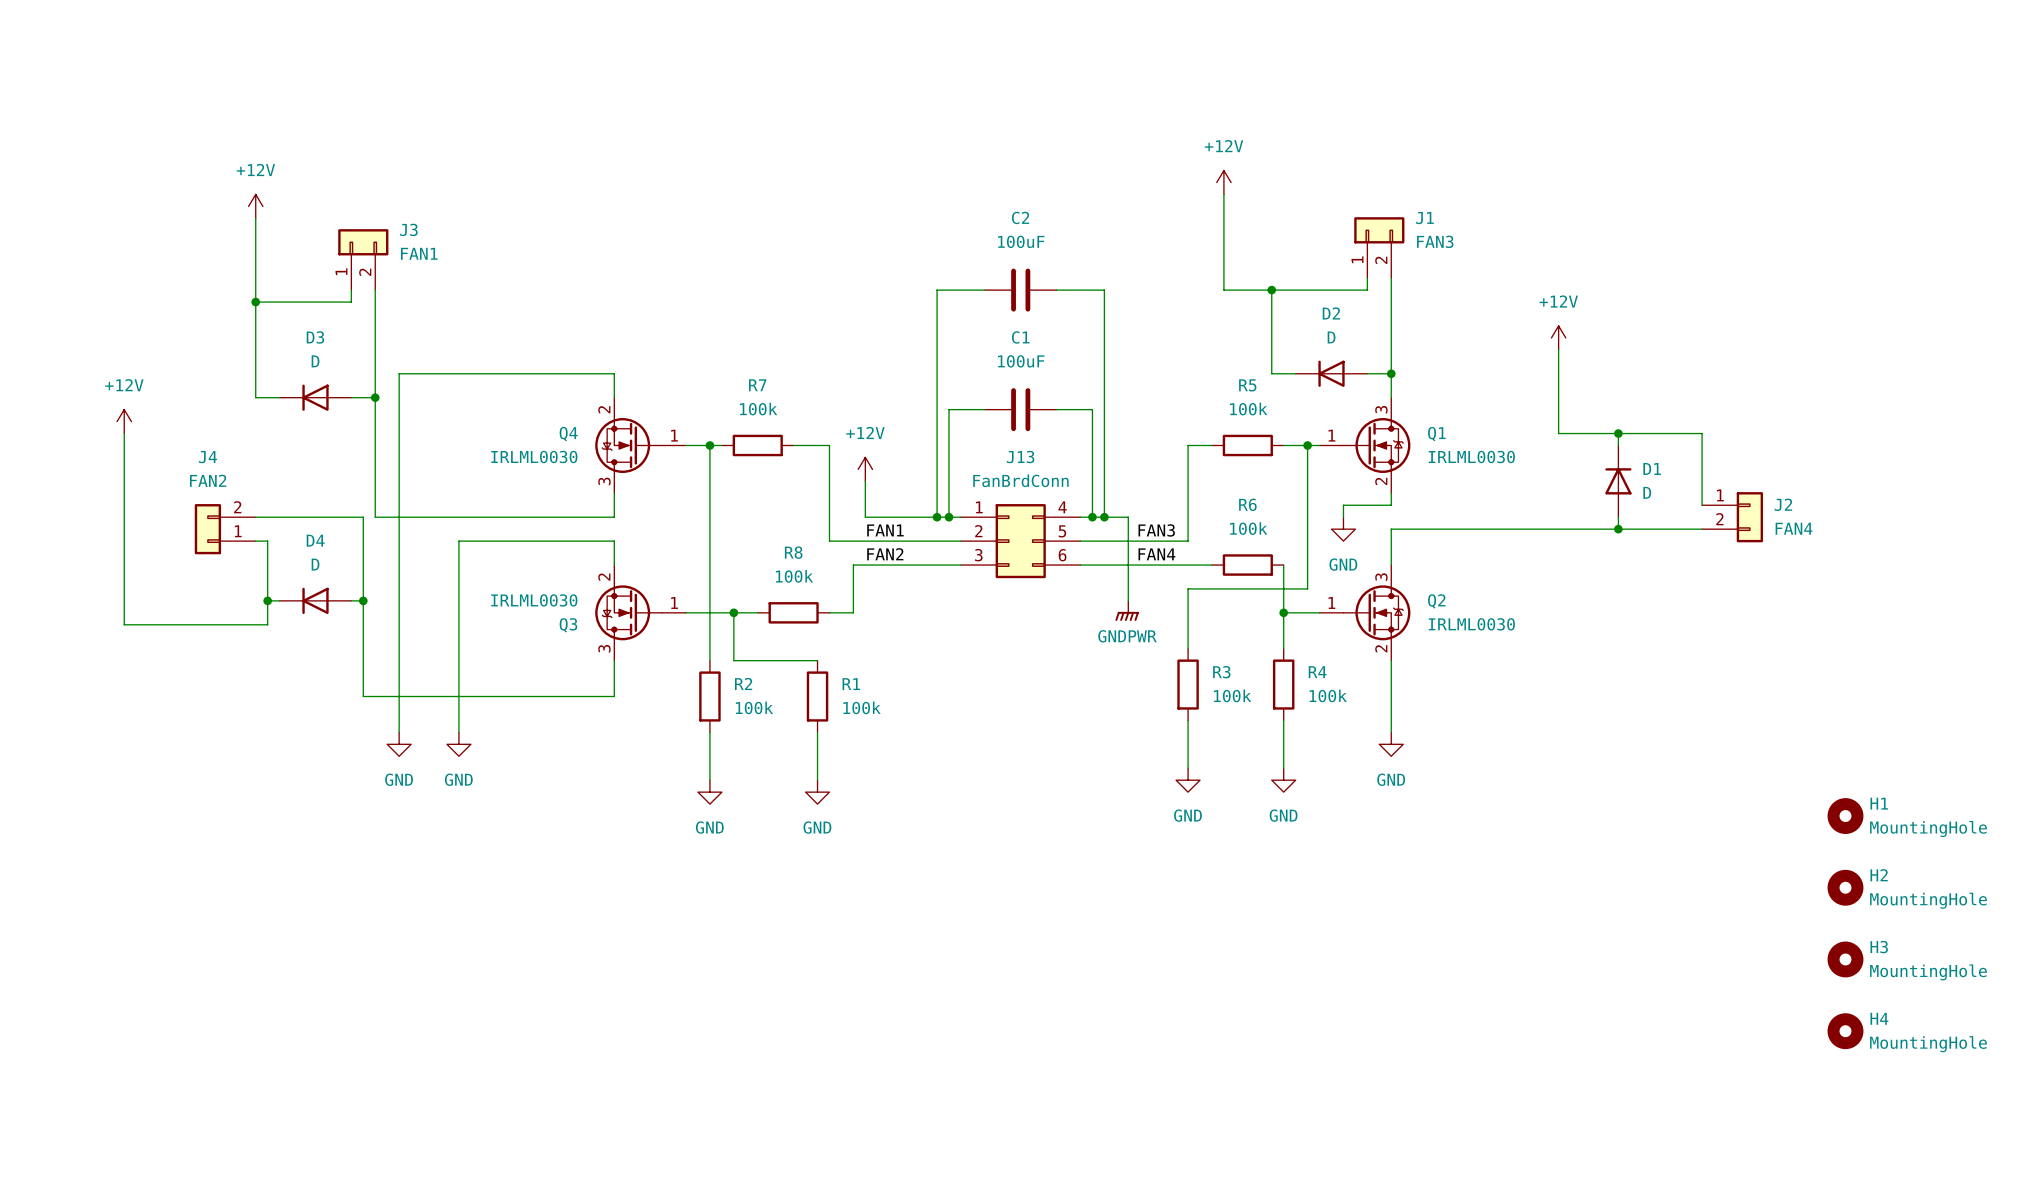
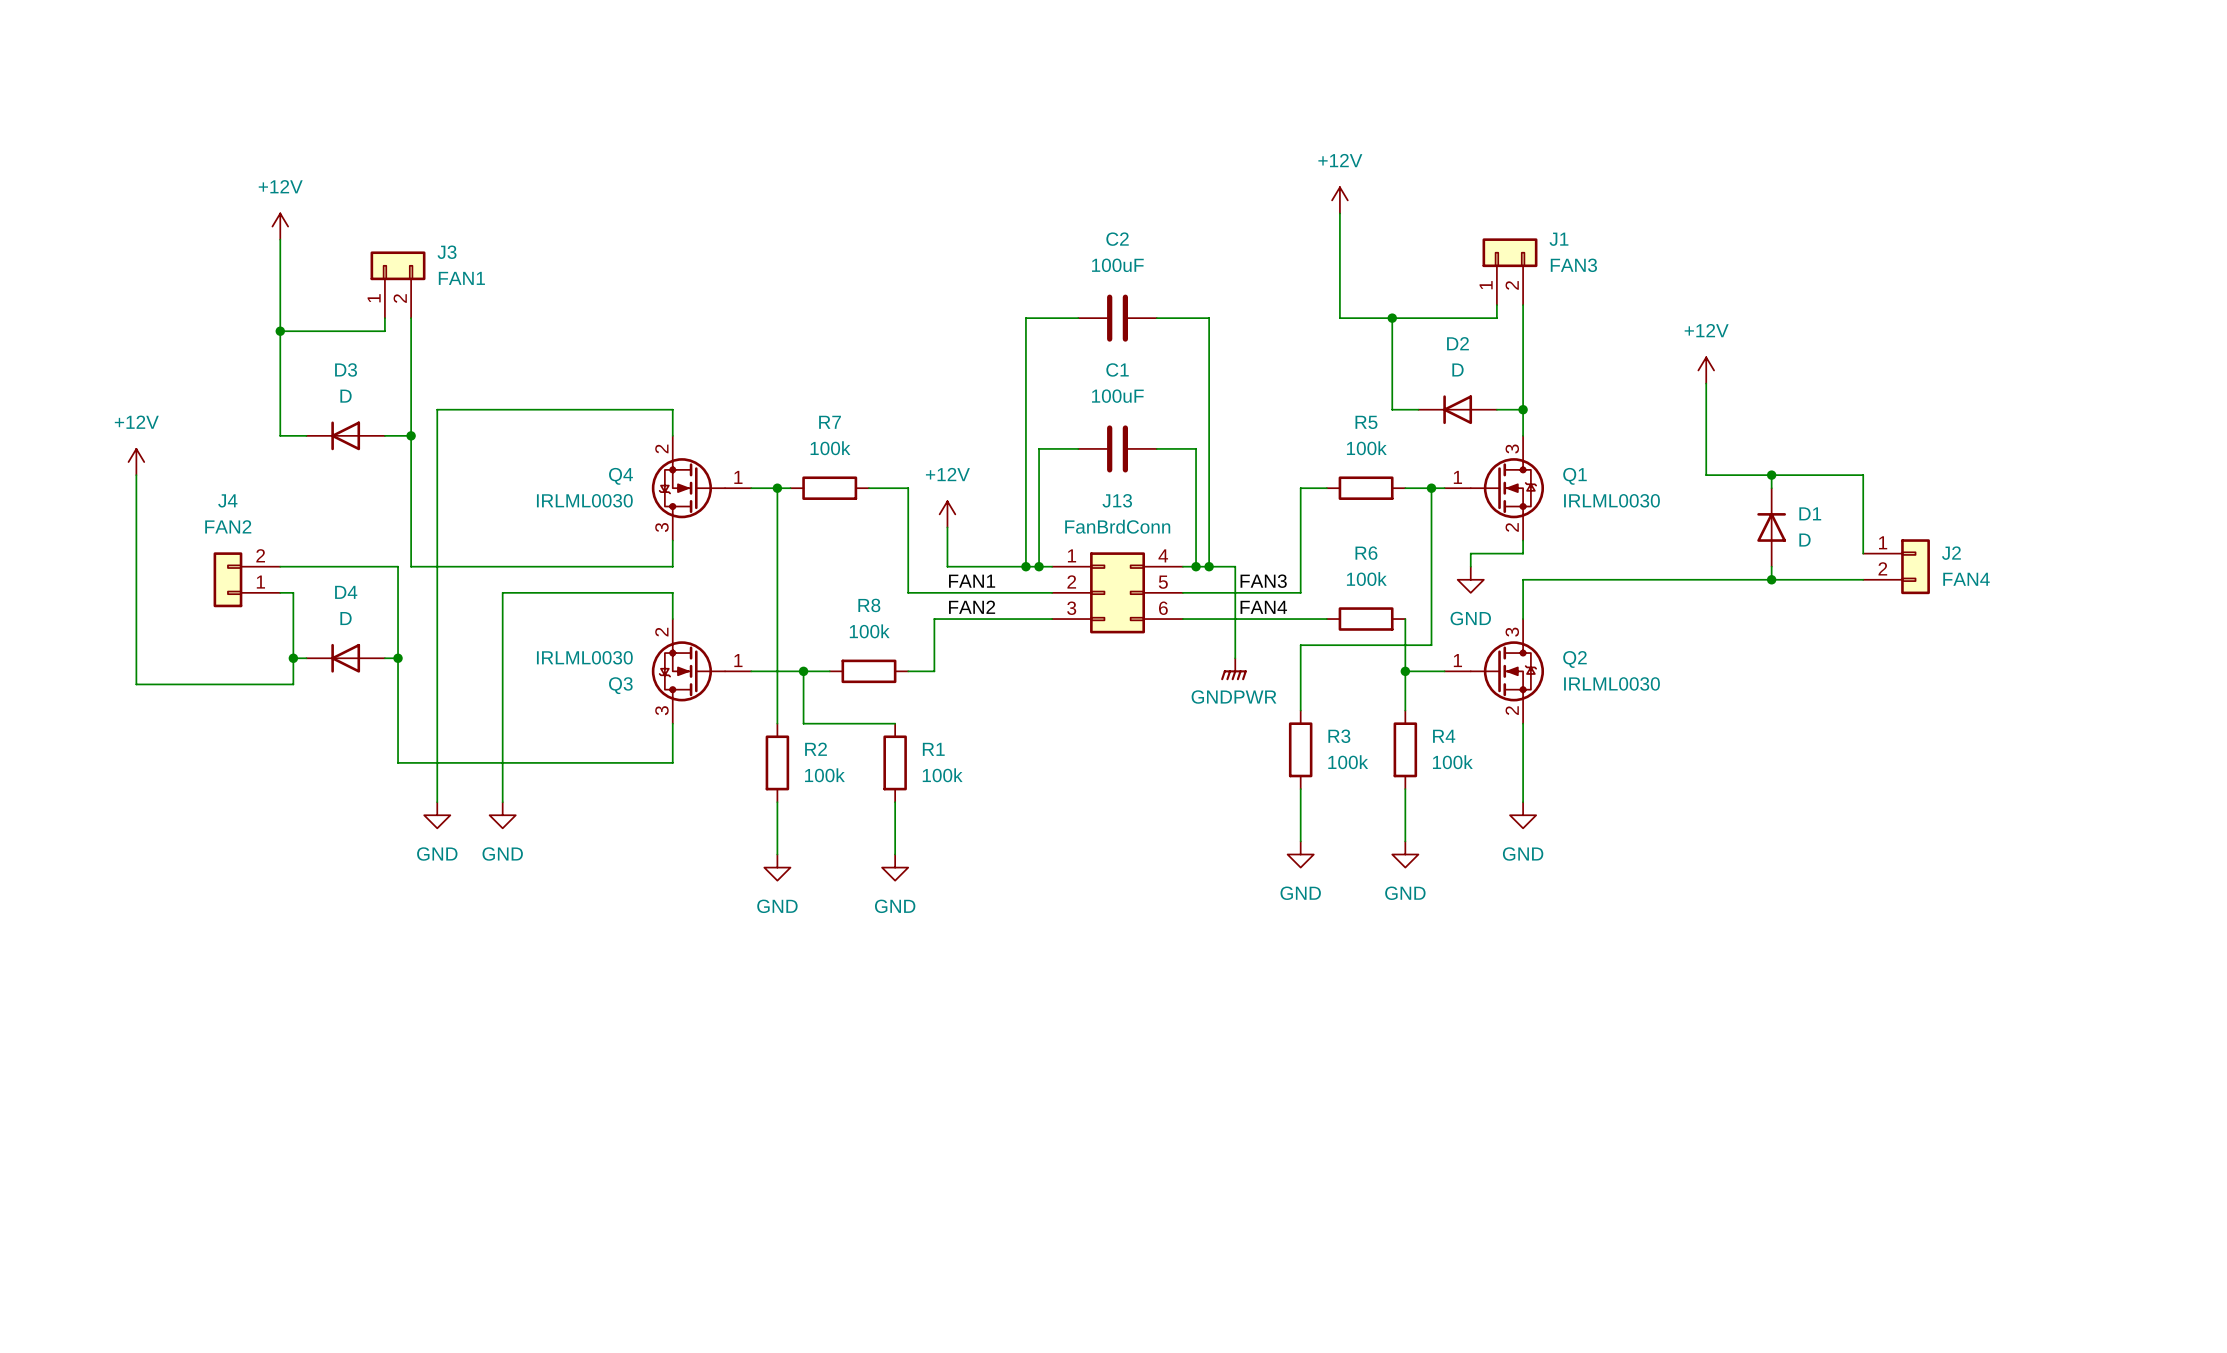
H1: MountingHole (1845, 816) -> none
H2: MountingHole (1845, 887) -> none
H3: MountingHole (1845, 959) -> none
H4: MountingHole (1845, 1031) -> none

